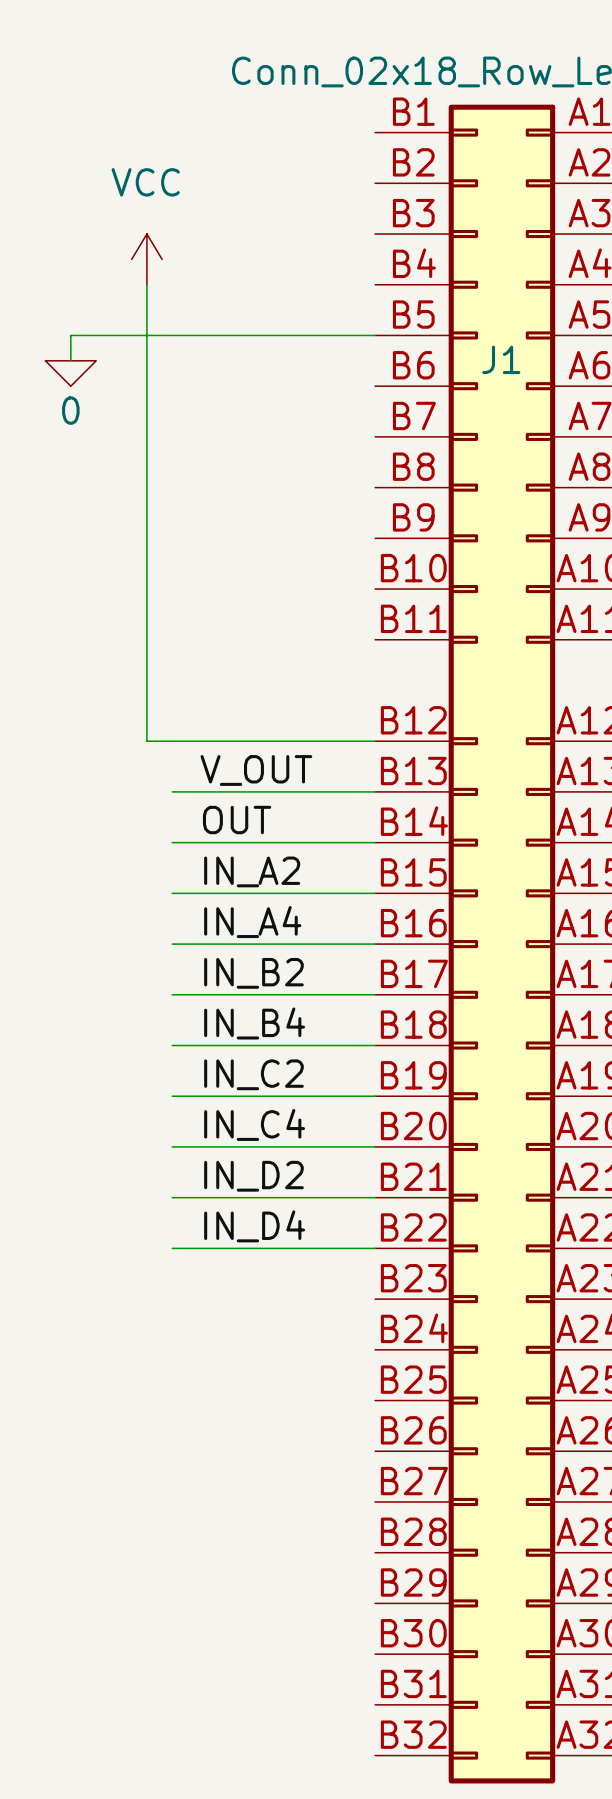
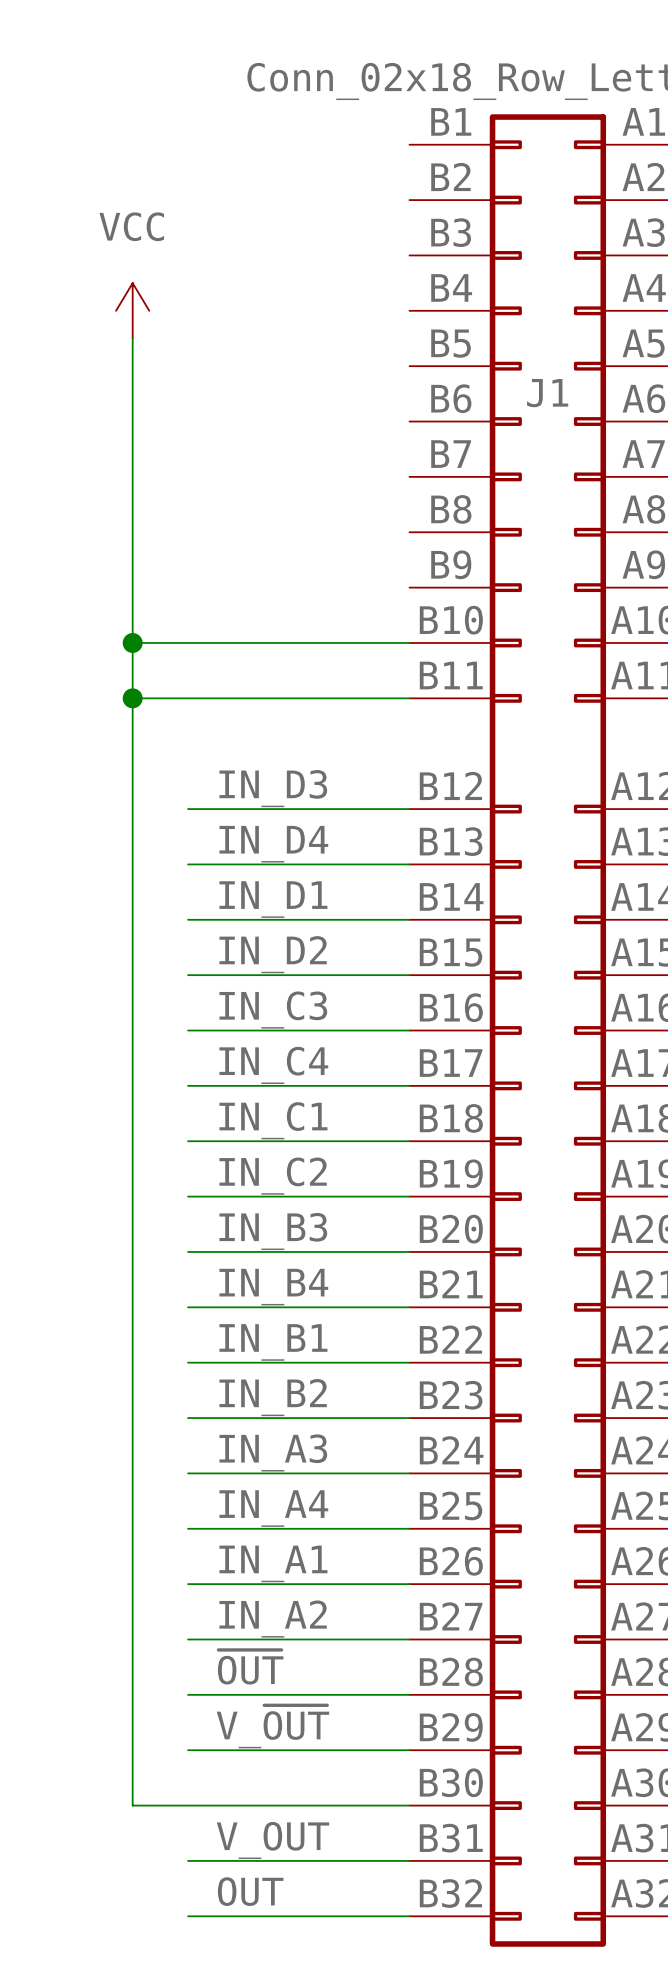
power symbol position: VCC (146, 259) -> VCC (132, 310)
wire: (146, 284) (146, 741) (172, 741) -> none
wire: none -> (132, 338) (132, 1805) (409, 1805)
wire: (375, 335) (70, 335) (70, 360) -> none
power symbol: 0 (70, 373) -> none
wire: none -> (132, 642) (409, 642)
junction: none -> (132, 642)
wire: none -> (132, 698) (409, 698)
junction: none -> (132, 698)
label: none -> IN_D3 (273, 788)
label: V_OUT (256, 770) -> IN_D4 (273, 844)
label: OUT (237, 820) -> IN_D1 (273, 899)
label: IN_A2 (252, 871) -> IN_D2 (273, 954)
label: IN_A4 (252, 922) -> IN_C3 (273, 1010)
label: IN_B2 (253, 973) -> IN_C4 (273, 1065)
label: IN_B4 (254, 1023) -> IN_C1 (273, 1120)
label: IN_C4 (254, 1124) -> IN_B3 (273, 1231)
label: IN_D2 (253, 1176) -> IN_B4 (273, 1287)
label: IN_D4 (254, 1226) -> IN_B1 (273, 1342)
label: none -> IN_B2 (273, 1397)
wire: none -> (188, 1418) (409, 1418)
label: none -> IN_A3 (273, 1452)
wire: none -> (188, 1473) (409, 1473)
label: none -> IN_A4 (273, 1508)
wire: none -> (188, 1528) (409, 1528)
label: none -> IN_A1 (273, 1563)
wire: none -> (188, 1584) (409, 1584)
label: none -> IN_A2 (273, 1619)
wire: none -> (188, 1639) (409, 1639)
label: none -> ~{OUT} (250, 1667)
wire: none -> (188, 1694) (409, 1694)
label: none -> V_~{OUT} (272, 1726)
wire: none -> (188, 1750) (409, 1750)
label: none -> V_OUT (272, 1840)
wire: none -> (188, 1860) (409, 1860)
label: none -> OUT (250, 1891)
wire: none -> (188, 1916) (409, 1916)

